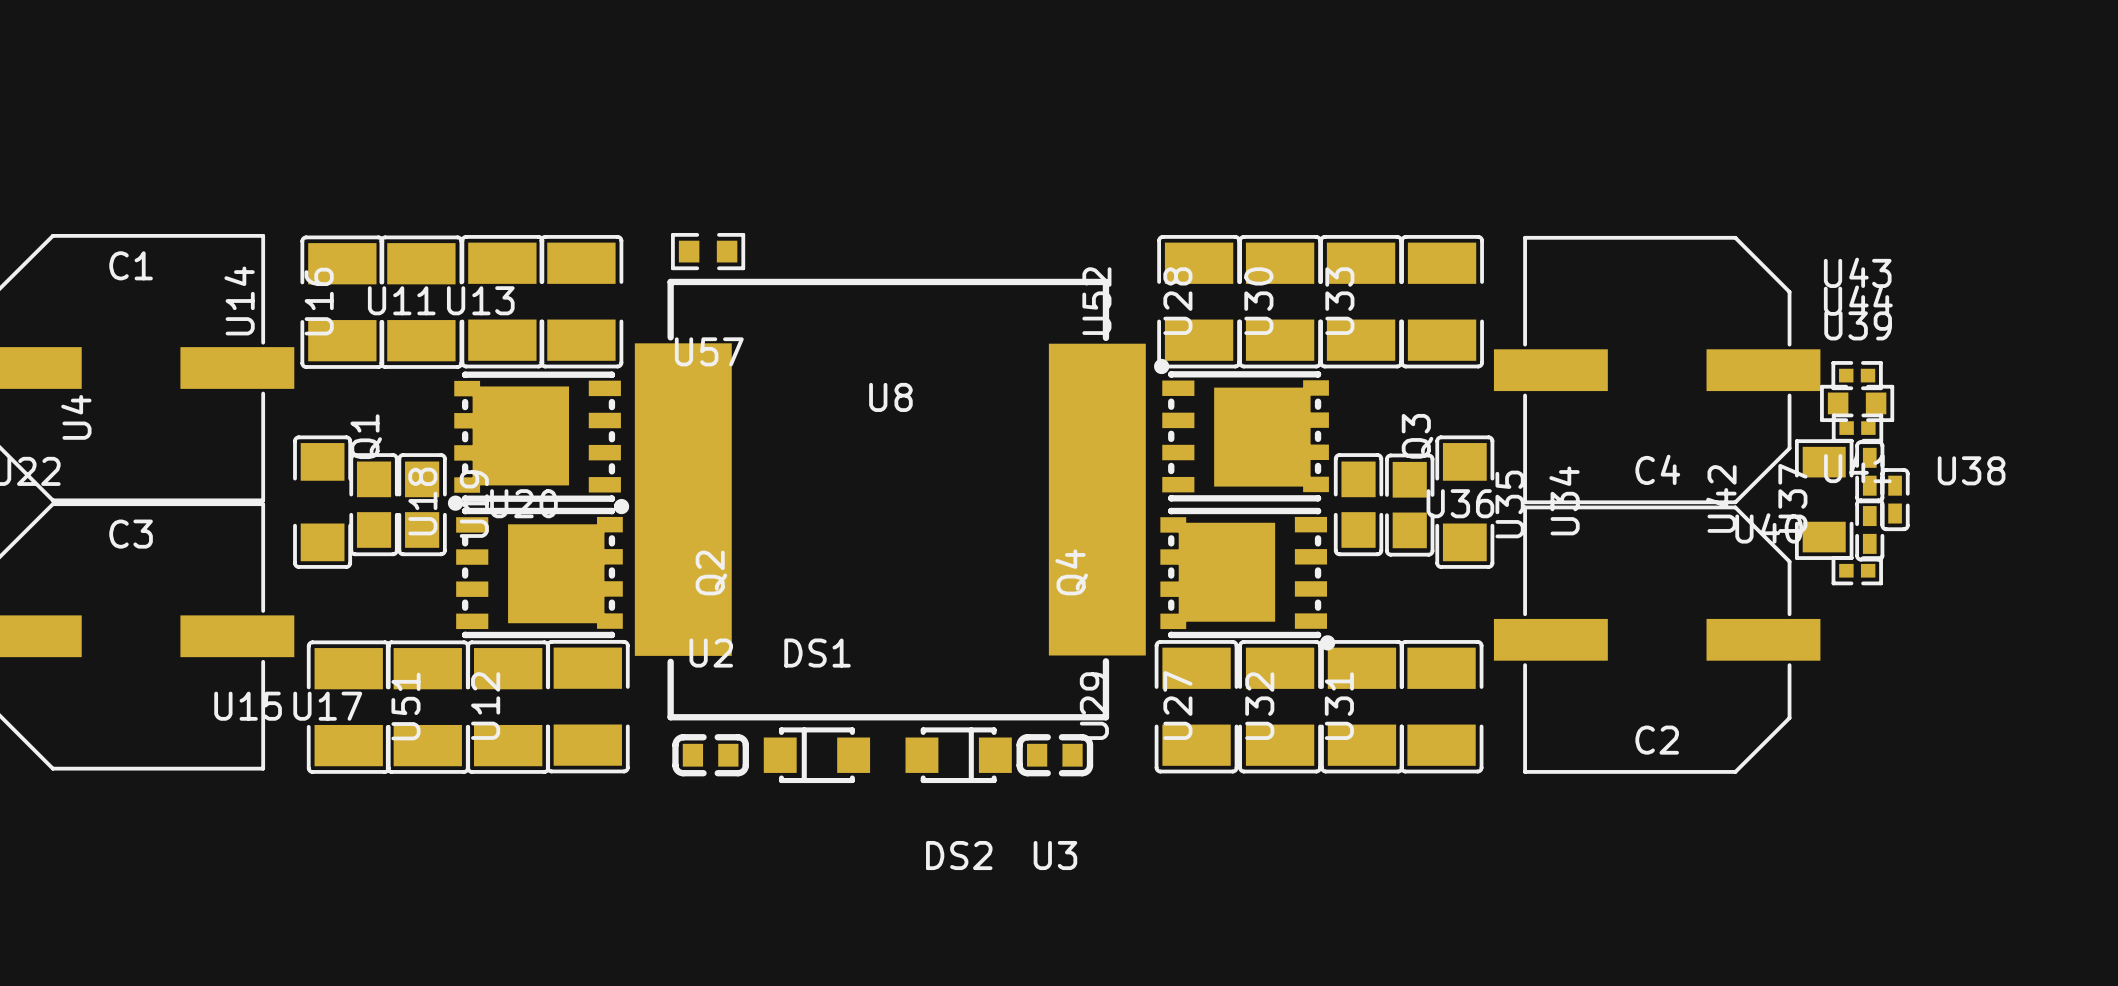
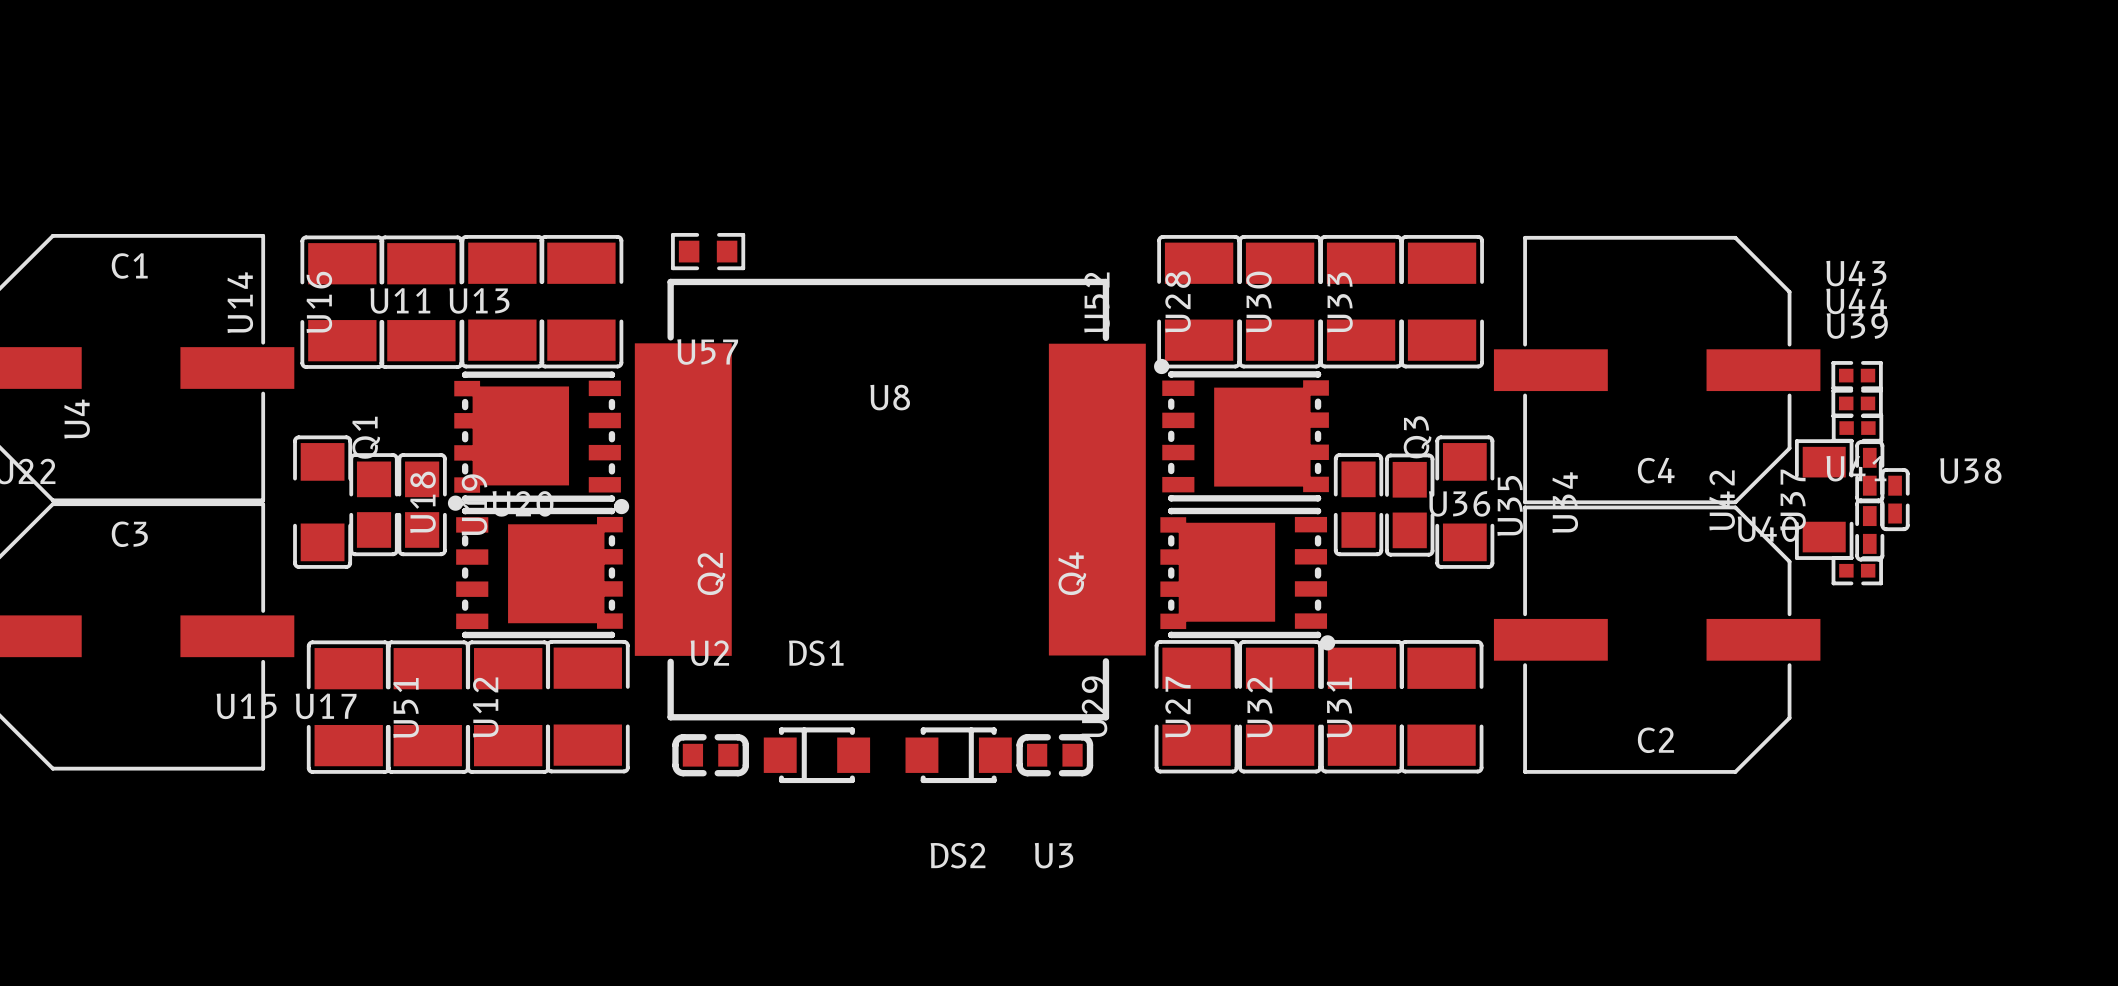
U44 footprint: [1820, 384, 1895, 423] -> [1831, 388, 1883, 418]

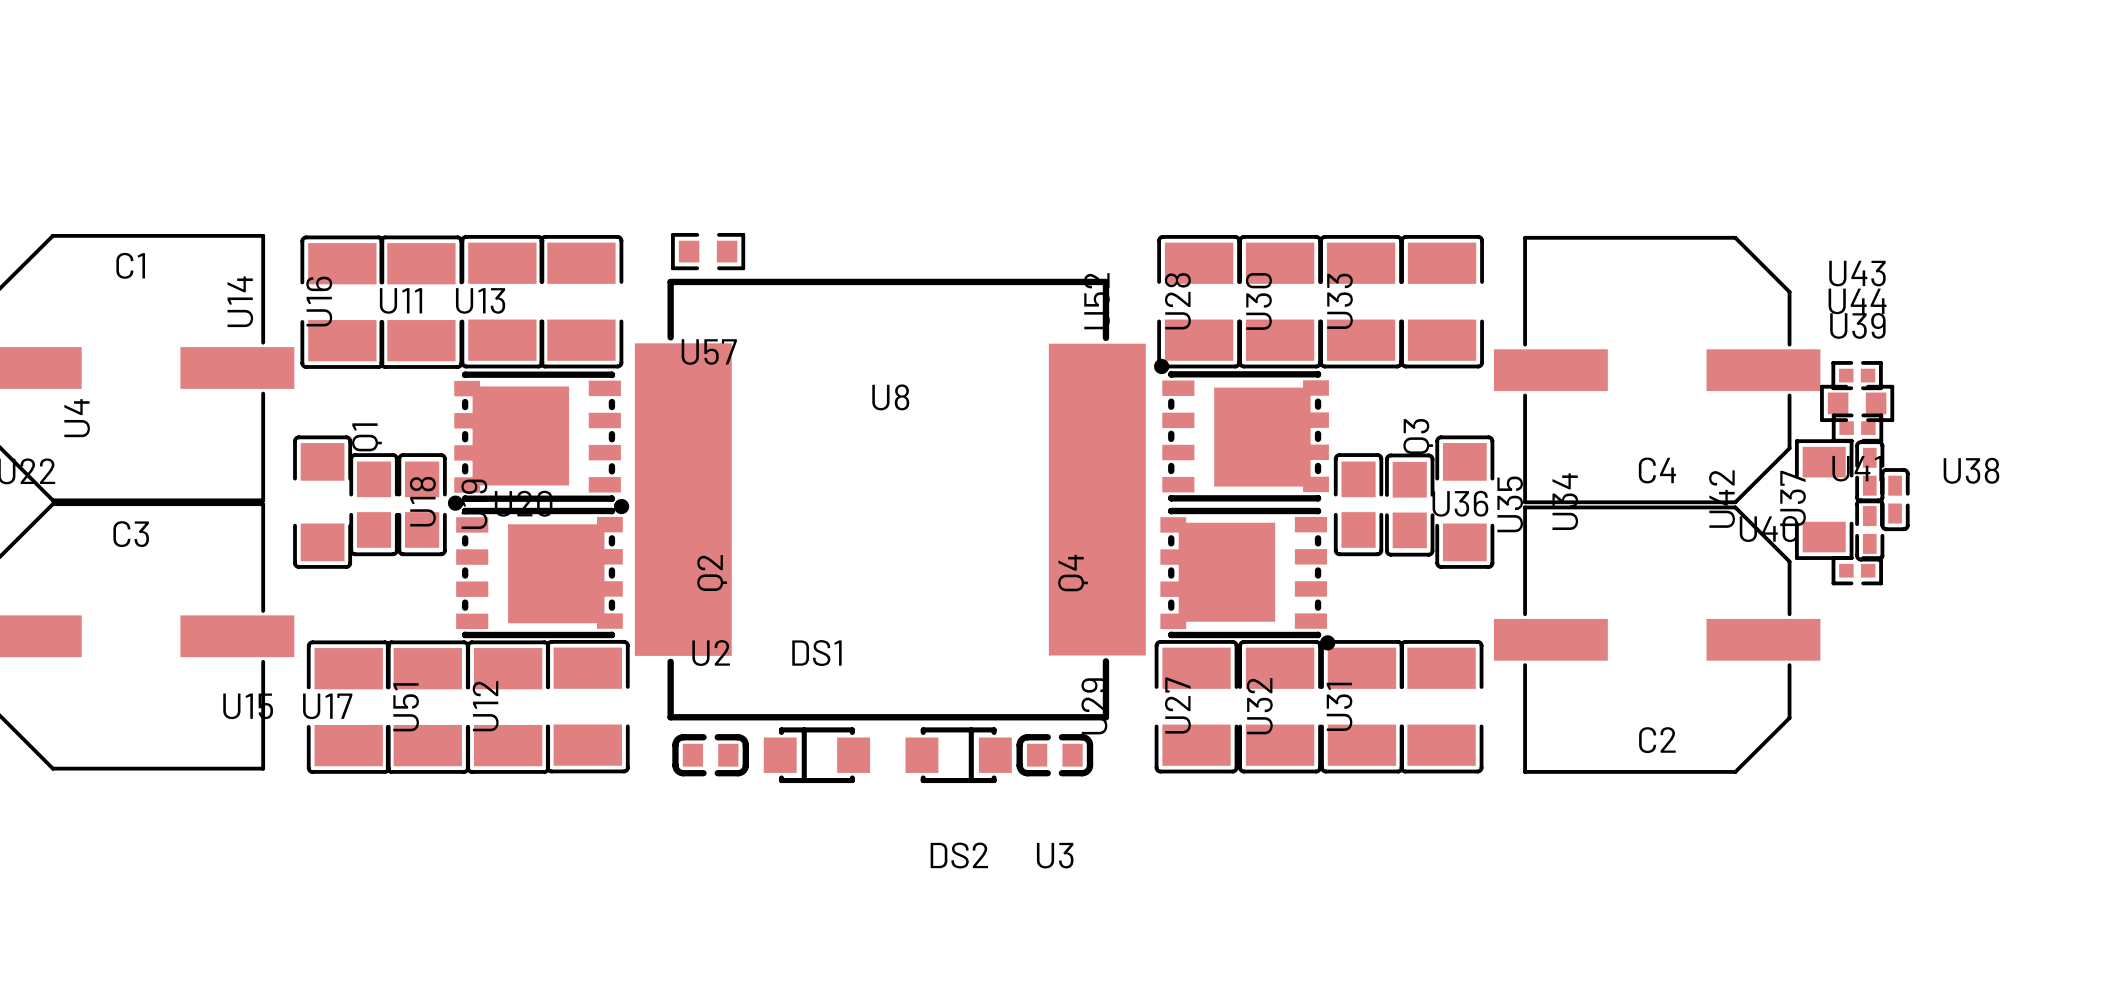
U44 footprint: [1831, 388, 1883, 418] -> [1820, 384, 1895, 423]

